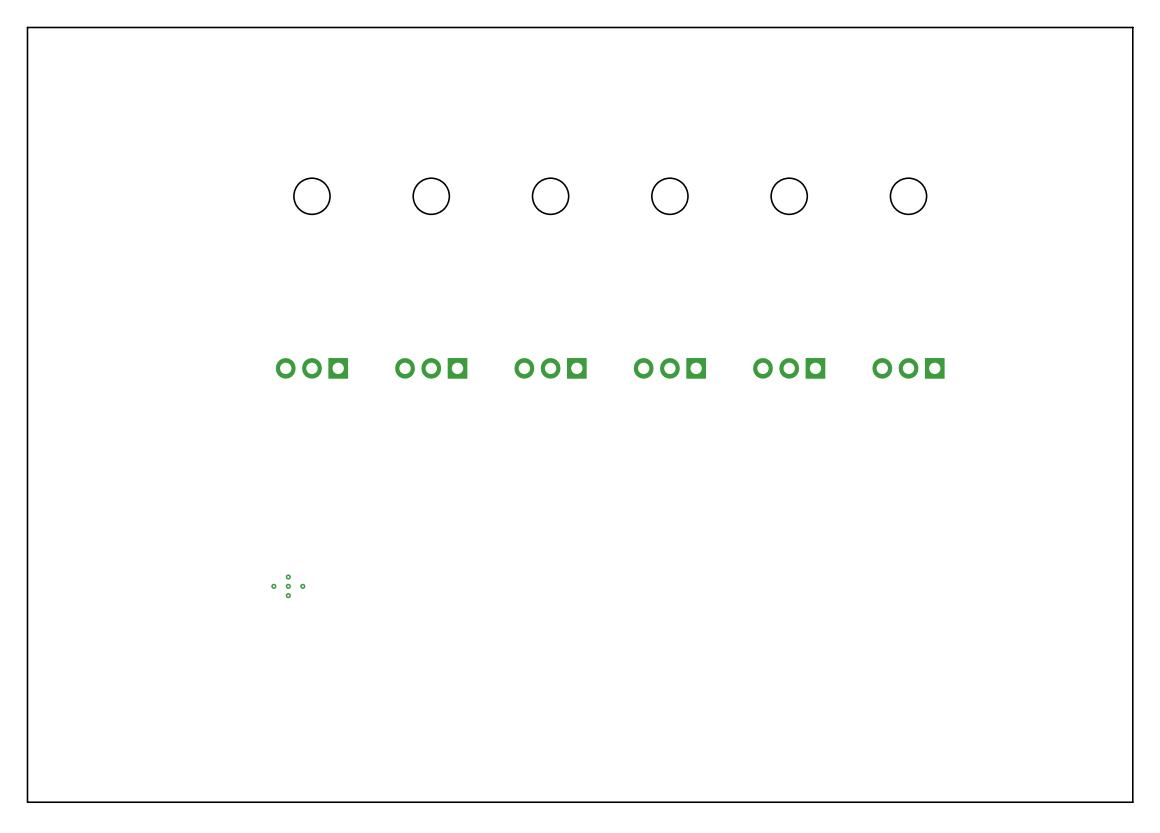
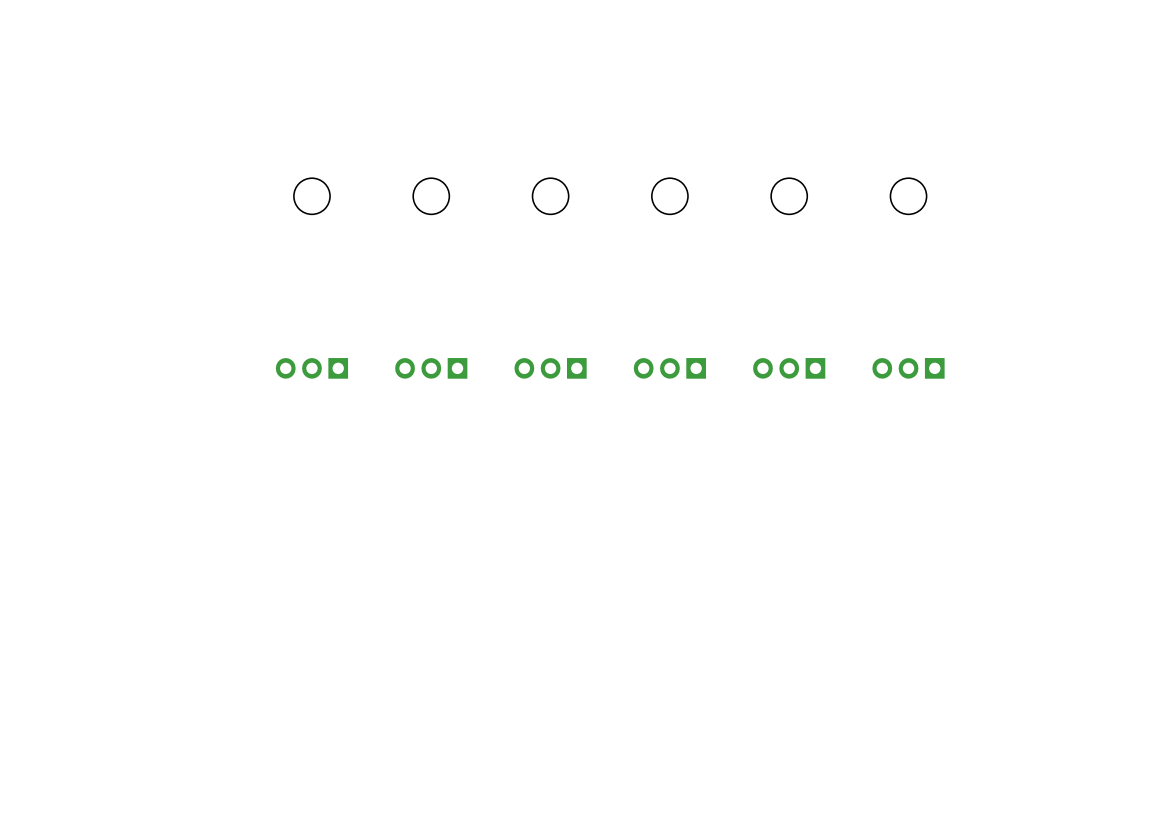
board edge: (1132, 27) (27, 27) (27, 802) (1132, 802) (1132, 27) -> none
part: (288, 586) -> none

